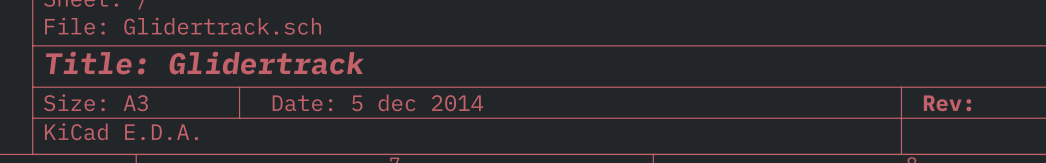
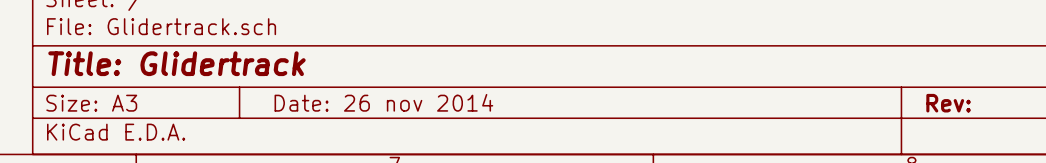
title block: Date: 5 dec 2014 (377, 102) -> Date: 26 nov 2014 (383, 102)

